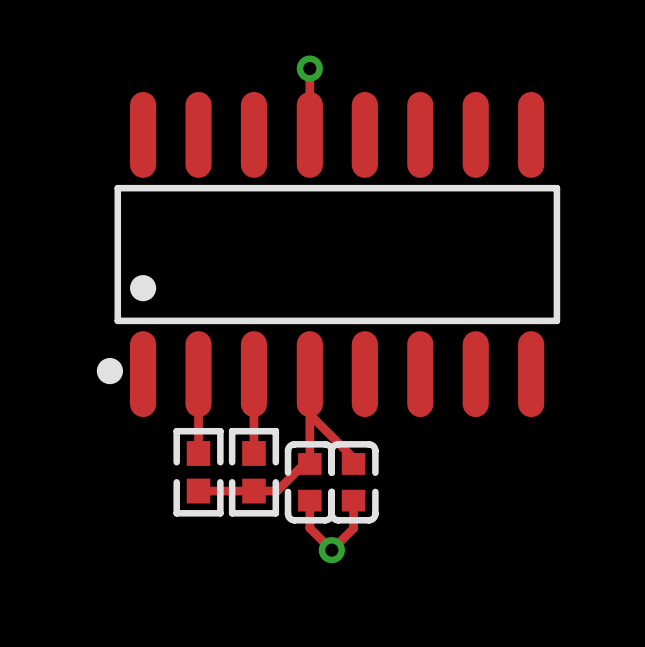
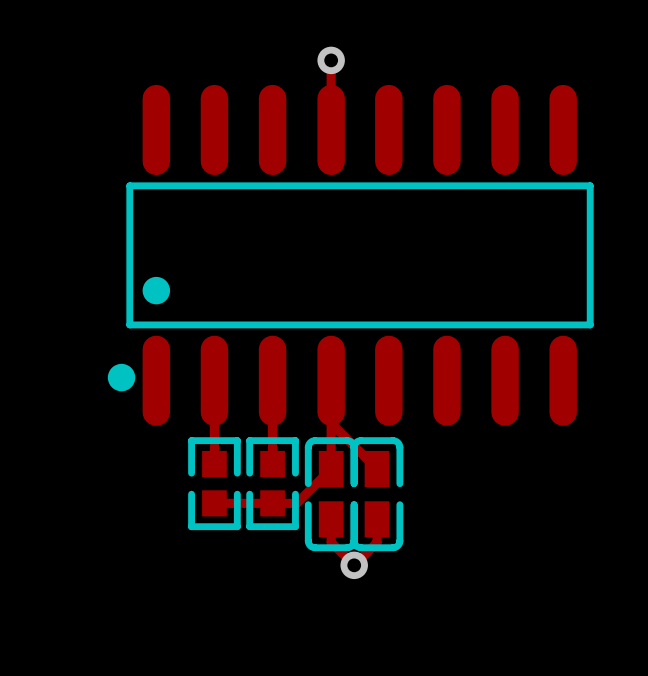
part footprint: [284, 441, 335, 524] -> [304, 437, 358, 552]
part footprint: [328, 441, 379, 524] -> [350, 437, 404, 552]

